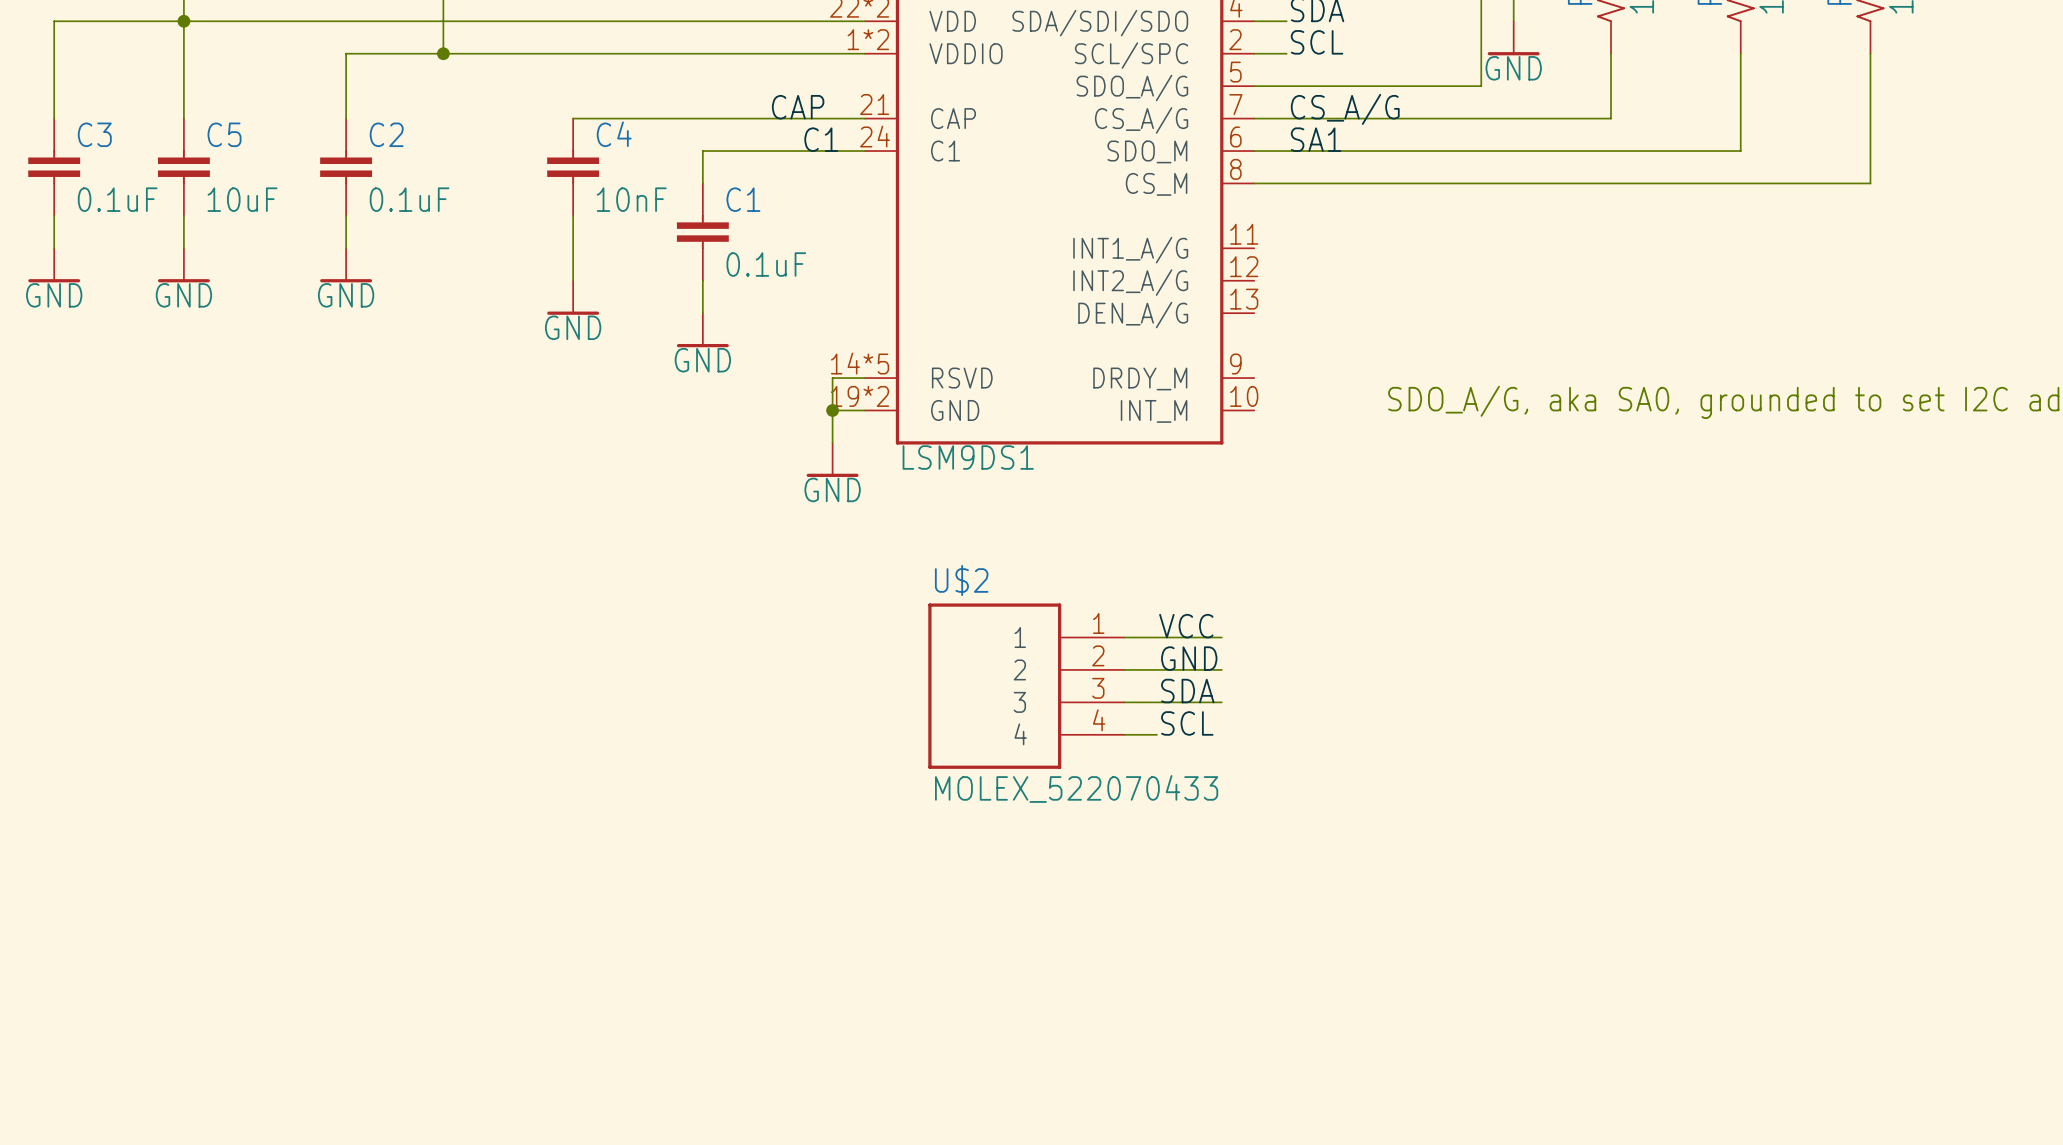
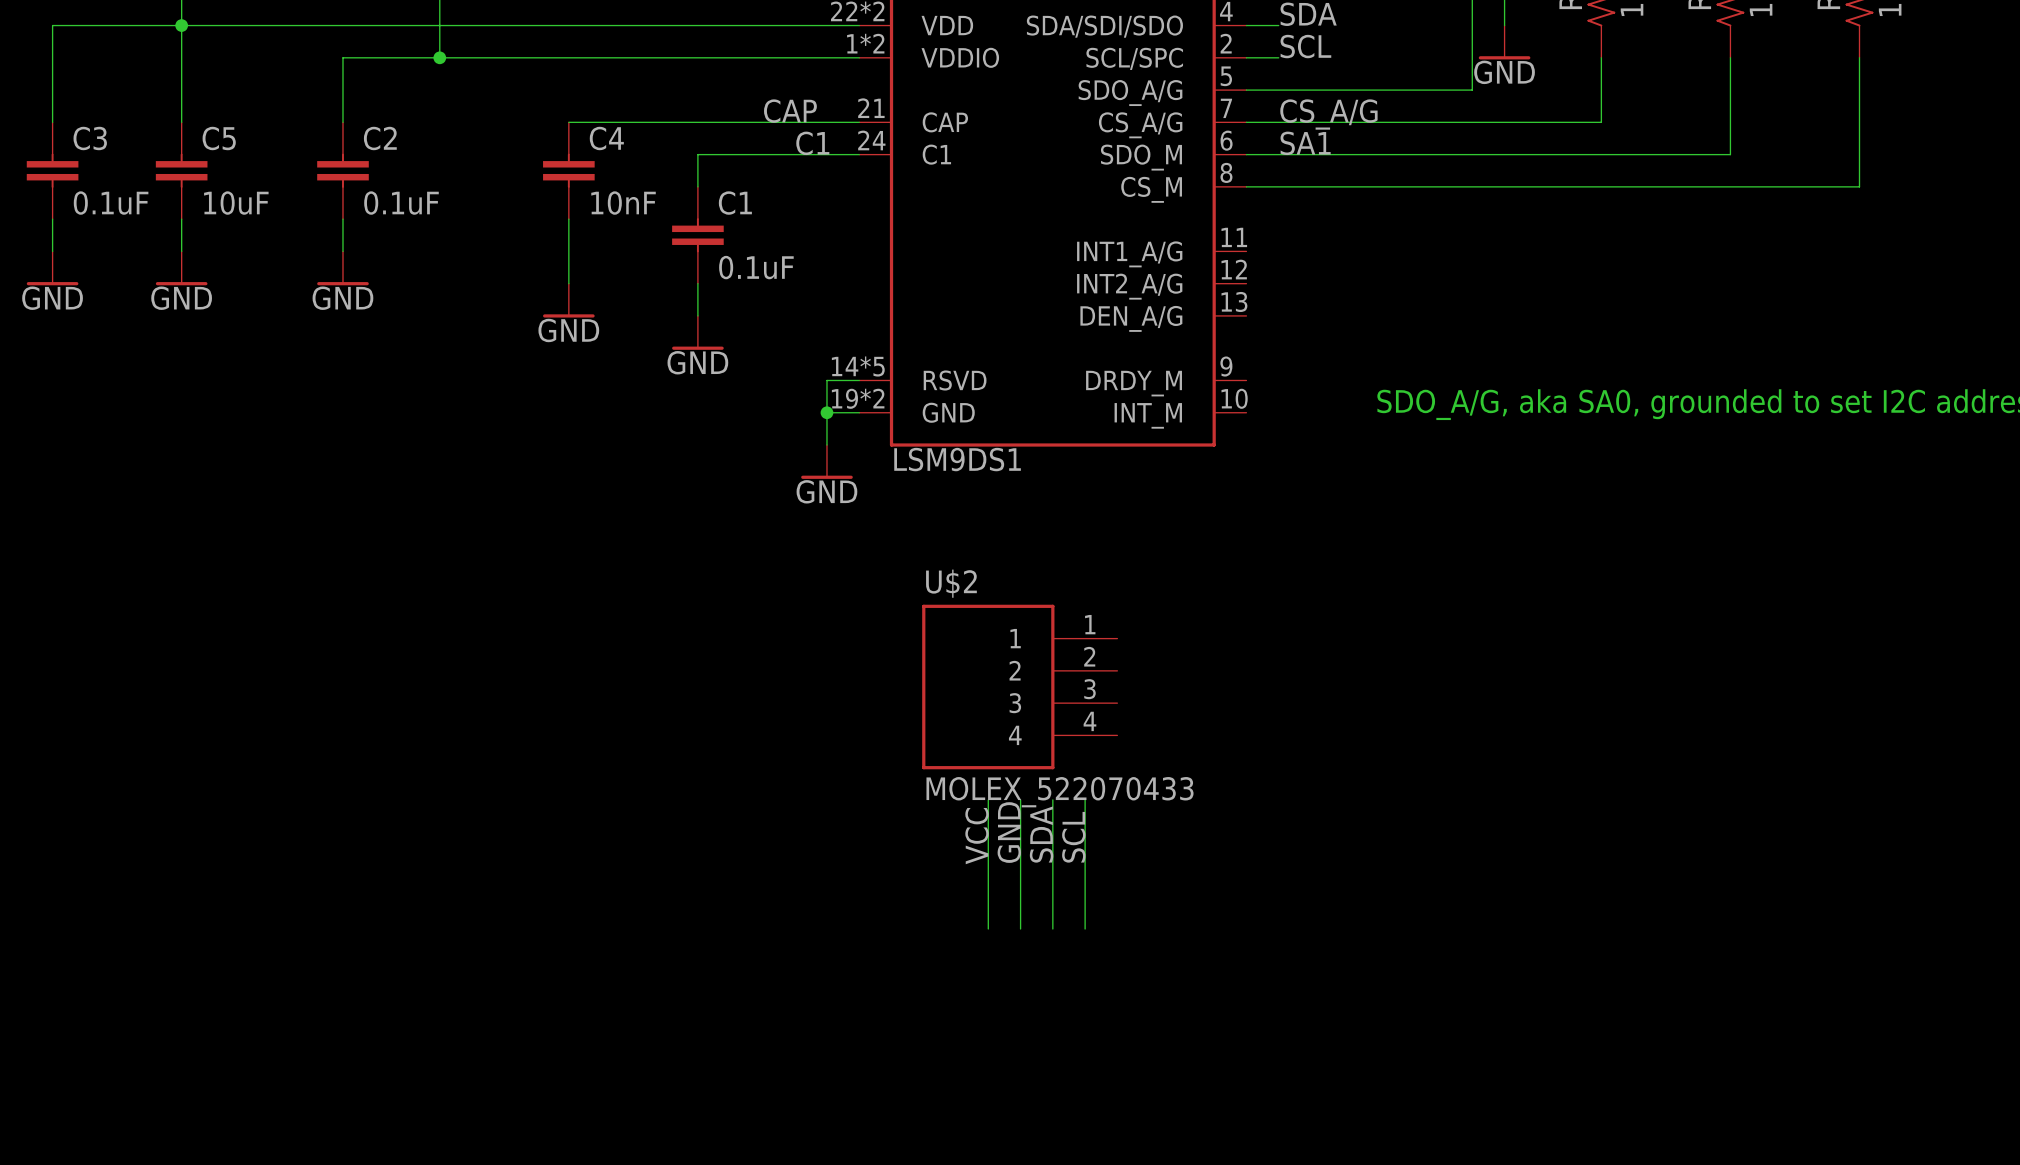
label rotation: 0° (1186, 626) -> 90° counterclockwise (977, 836)
label position: VCC (1186, 626) -> VCC (977, 836)
wire: (1124, 637) (1221, 637) -> none
label rotation: 0° (1189, 658) -> 90° counterclockwise (1009, 832)
label position: GND (1189, 658) -> GND (1009, 832)
wire: (1124, 669) (1221, 669) -> none
label rotation: 0° (1187, 691) -> 90° counterclockwise (1041, 834)
label position: SDA (1187, 691) -> SDA (1041, 834)
wire: (1124, 702) (1221, 702) -> none
label rotation: 0° (1187, 723) -> 90° counterclockwise (1073, 837)
label position: SCL (1187, 723) -> SCL (1073, 837)
wire: (1124, 734) (1156, 734) -> none
wire: none -> (988, 799) (988, 929)
wire: none -> (1020, 799) (1020, 929)
wire: none -> (1052, 799) (1052, 929)
wire: none -> (1085, 799) (1085, 929)

